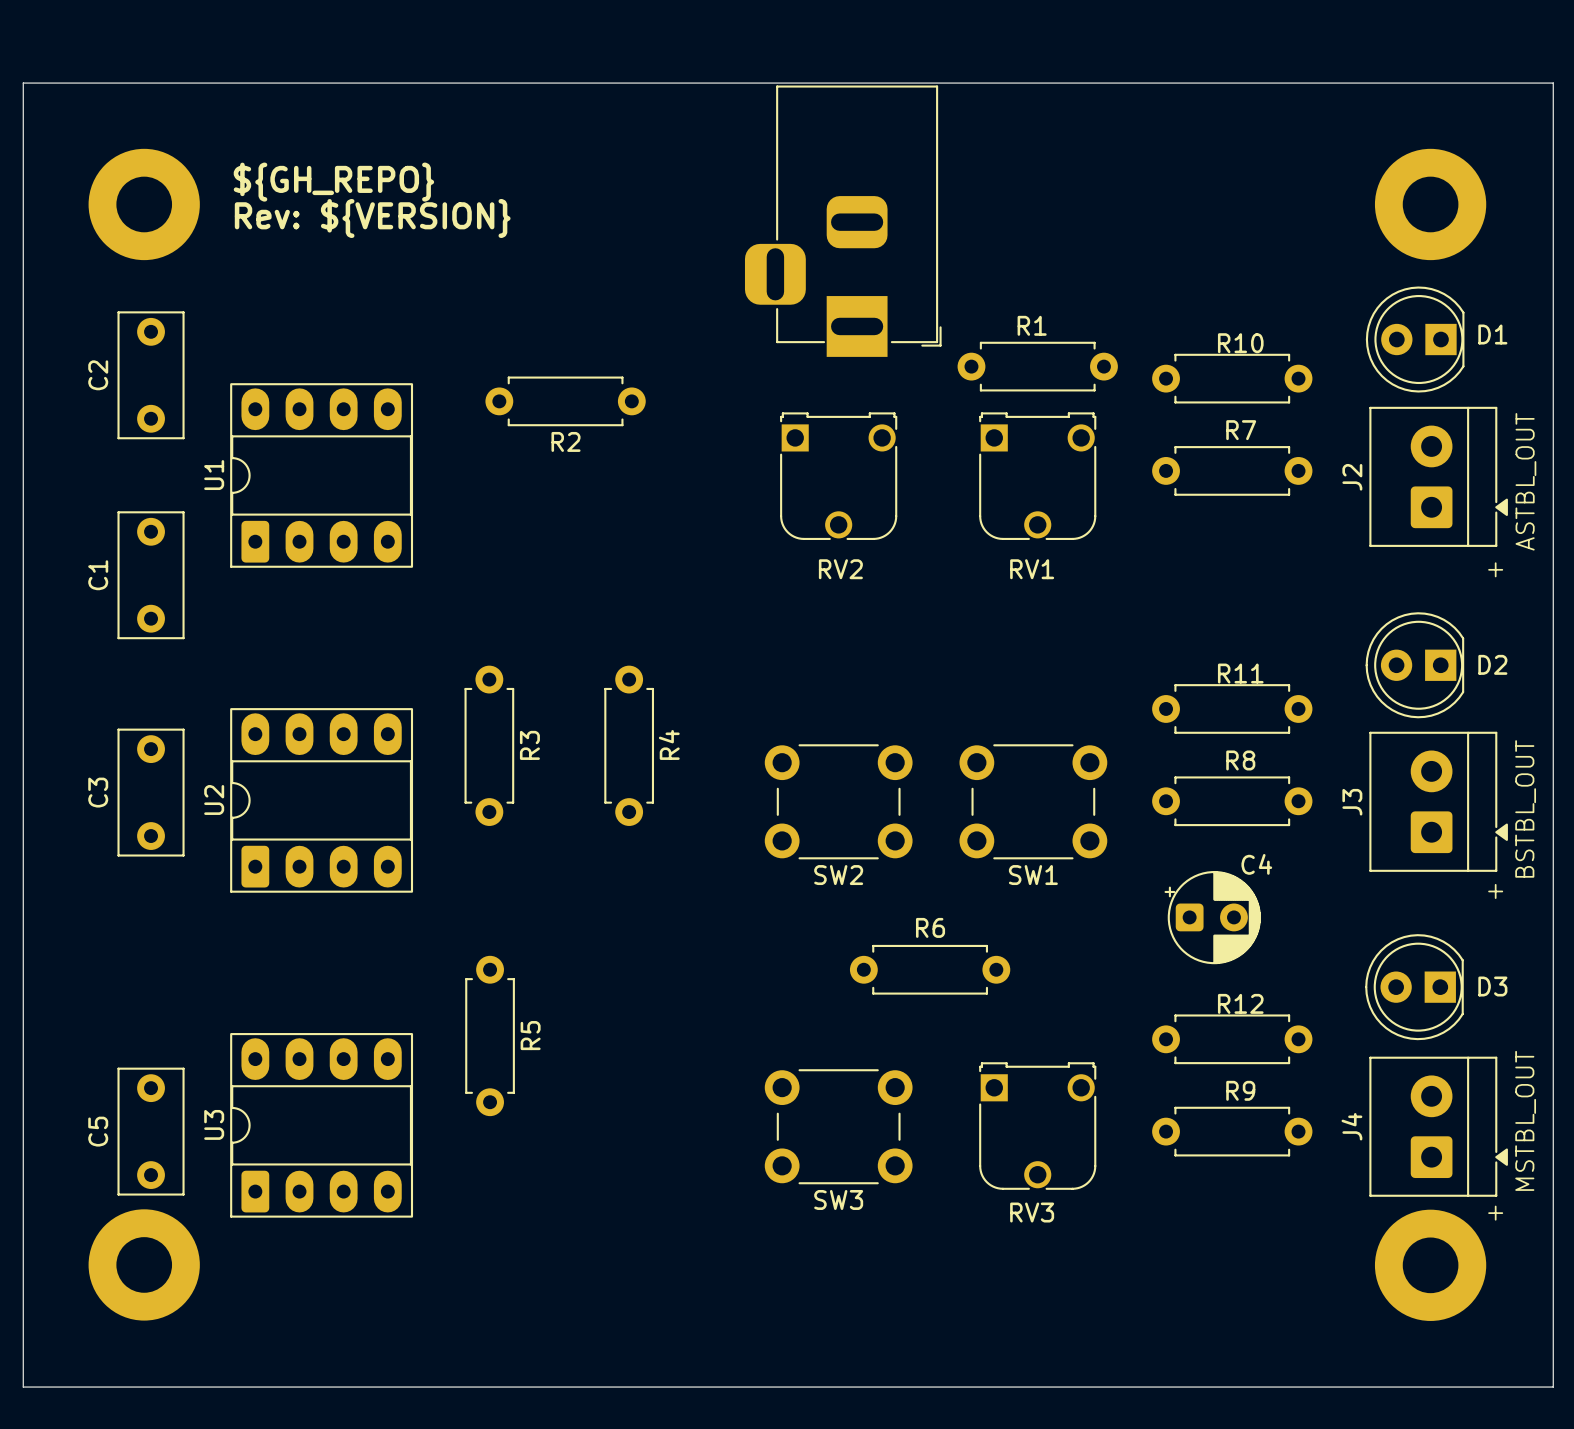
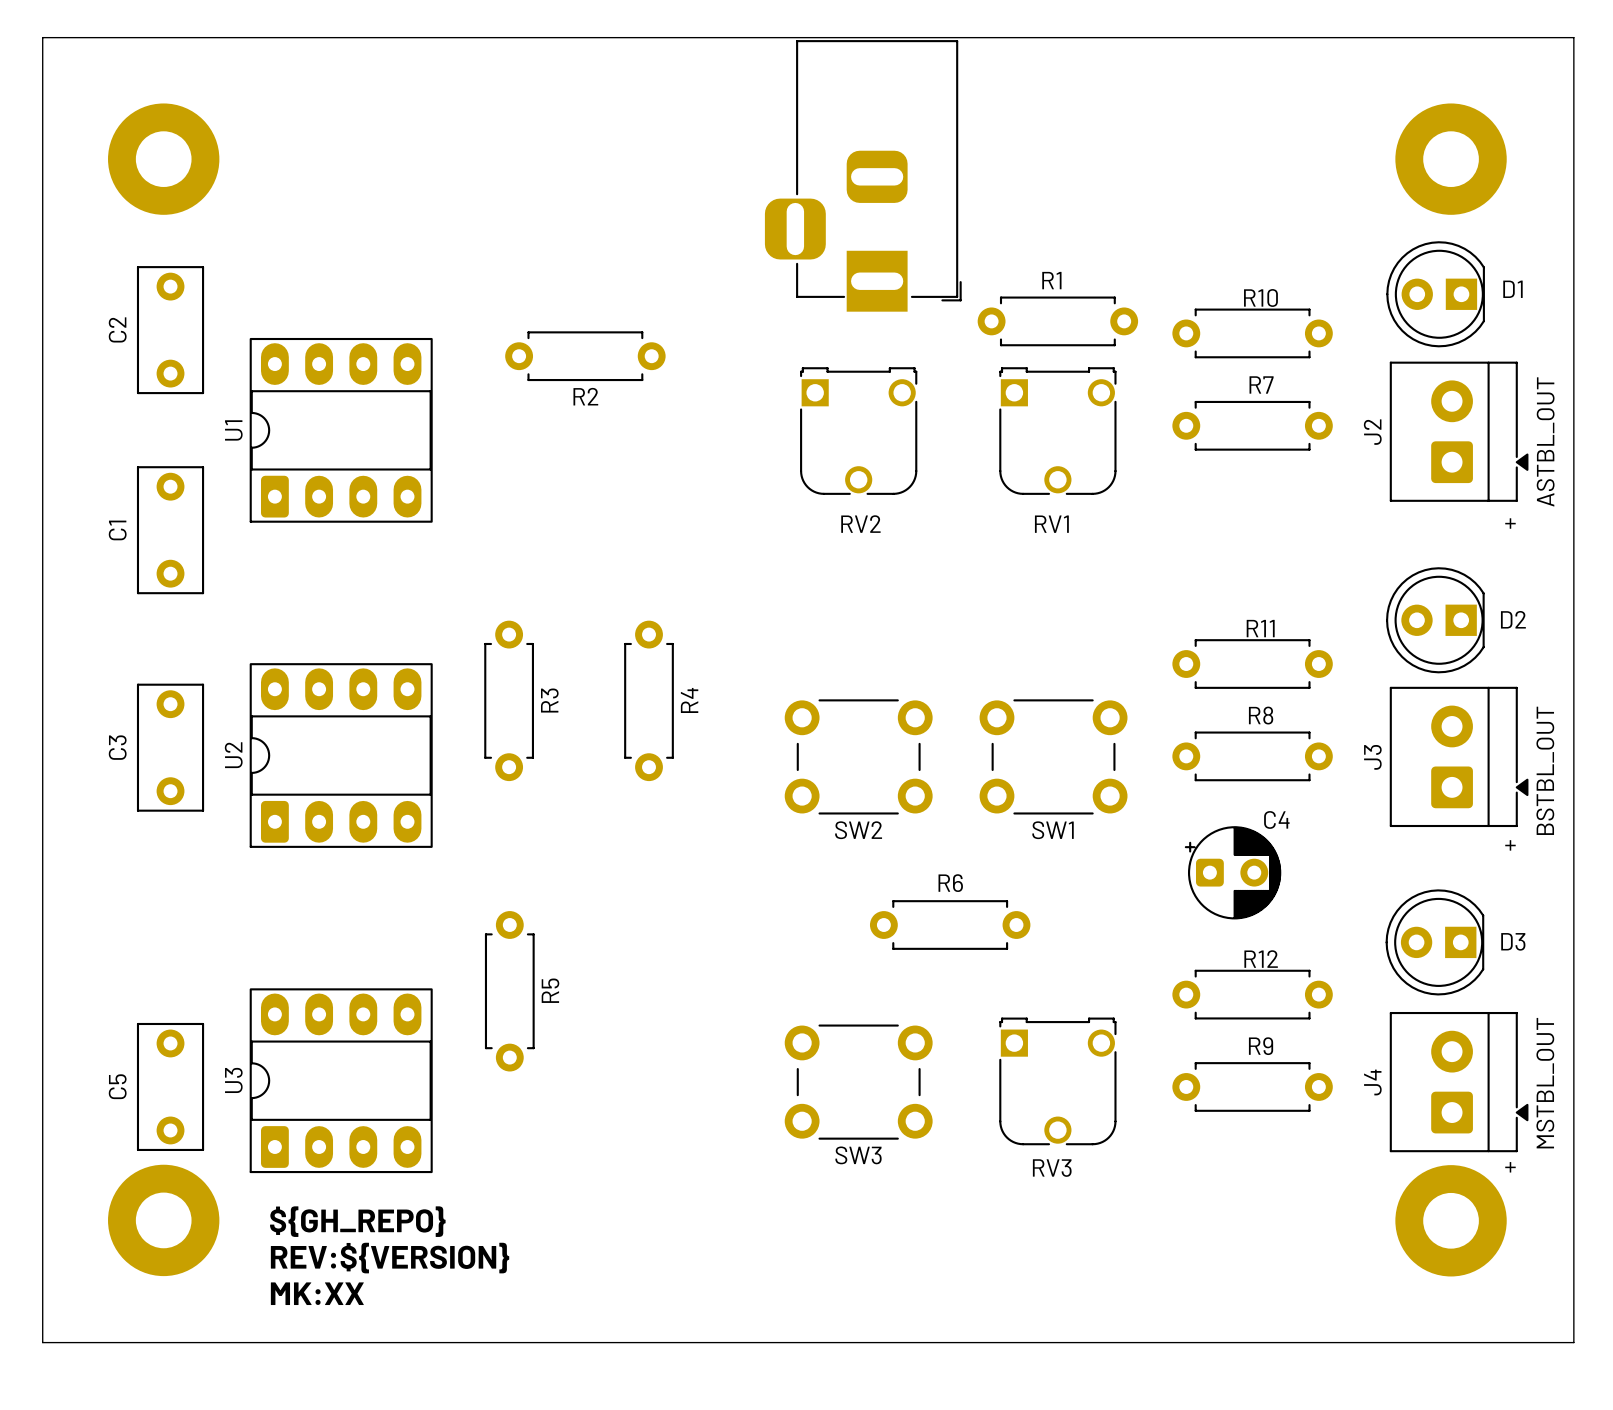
text: ${GH_REPO} (333, 182) -> none
text: Rev: ${VERSION} (372, 218) -> none
text: none -> ${GH_REPO} (357, 1221)
text: none -> REV:${VERSION} (390, 1258)
text: none -> MK:XX (317, 1293)

